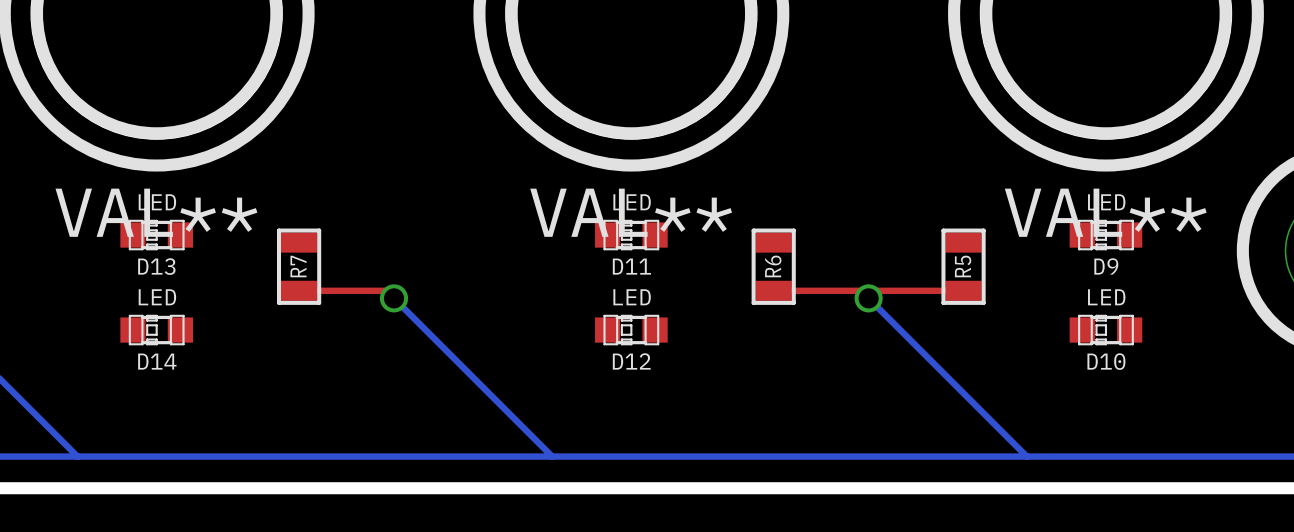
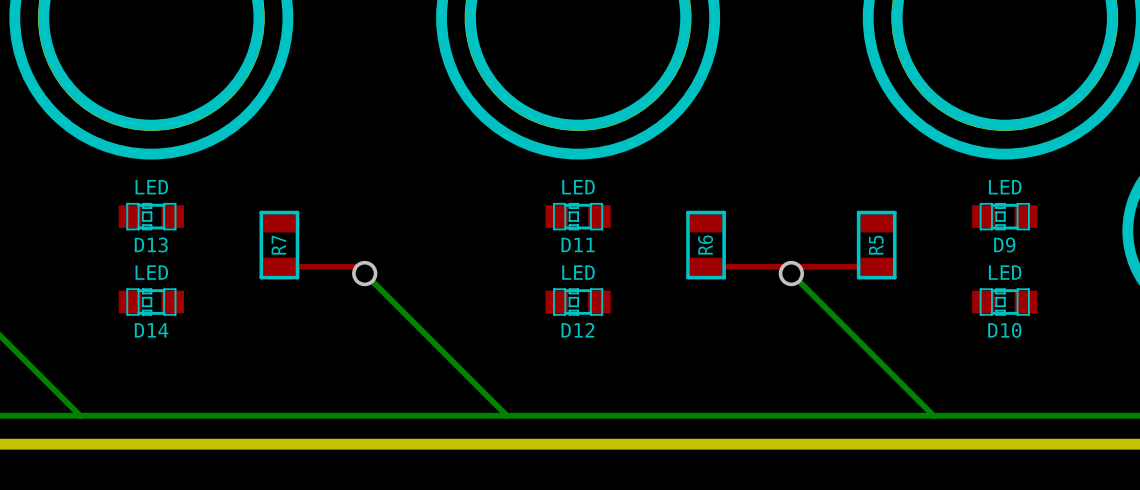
part value: VAL** (156, 212) -> none
part value: VAL** (631, 212) -> none
part value: VAL** (1105, 212) -> none

